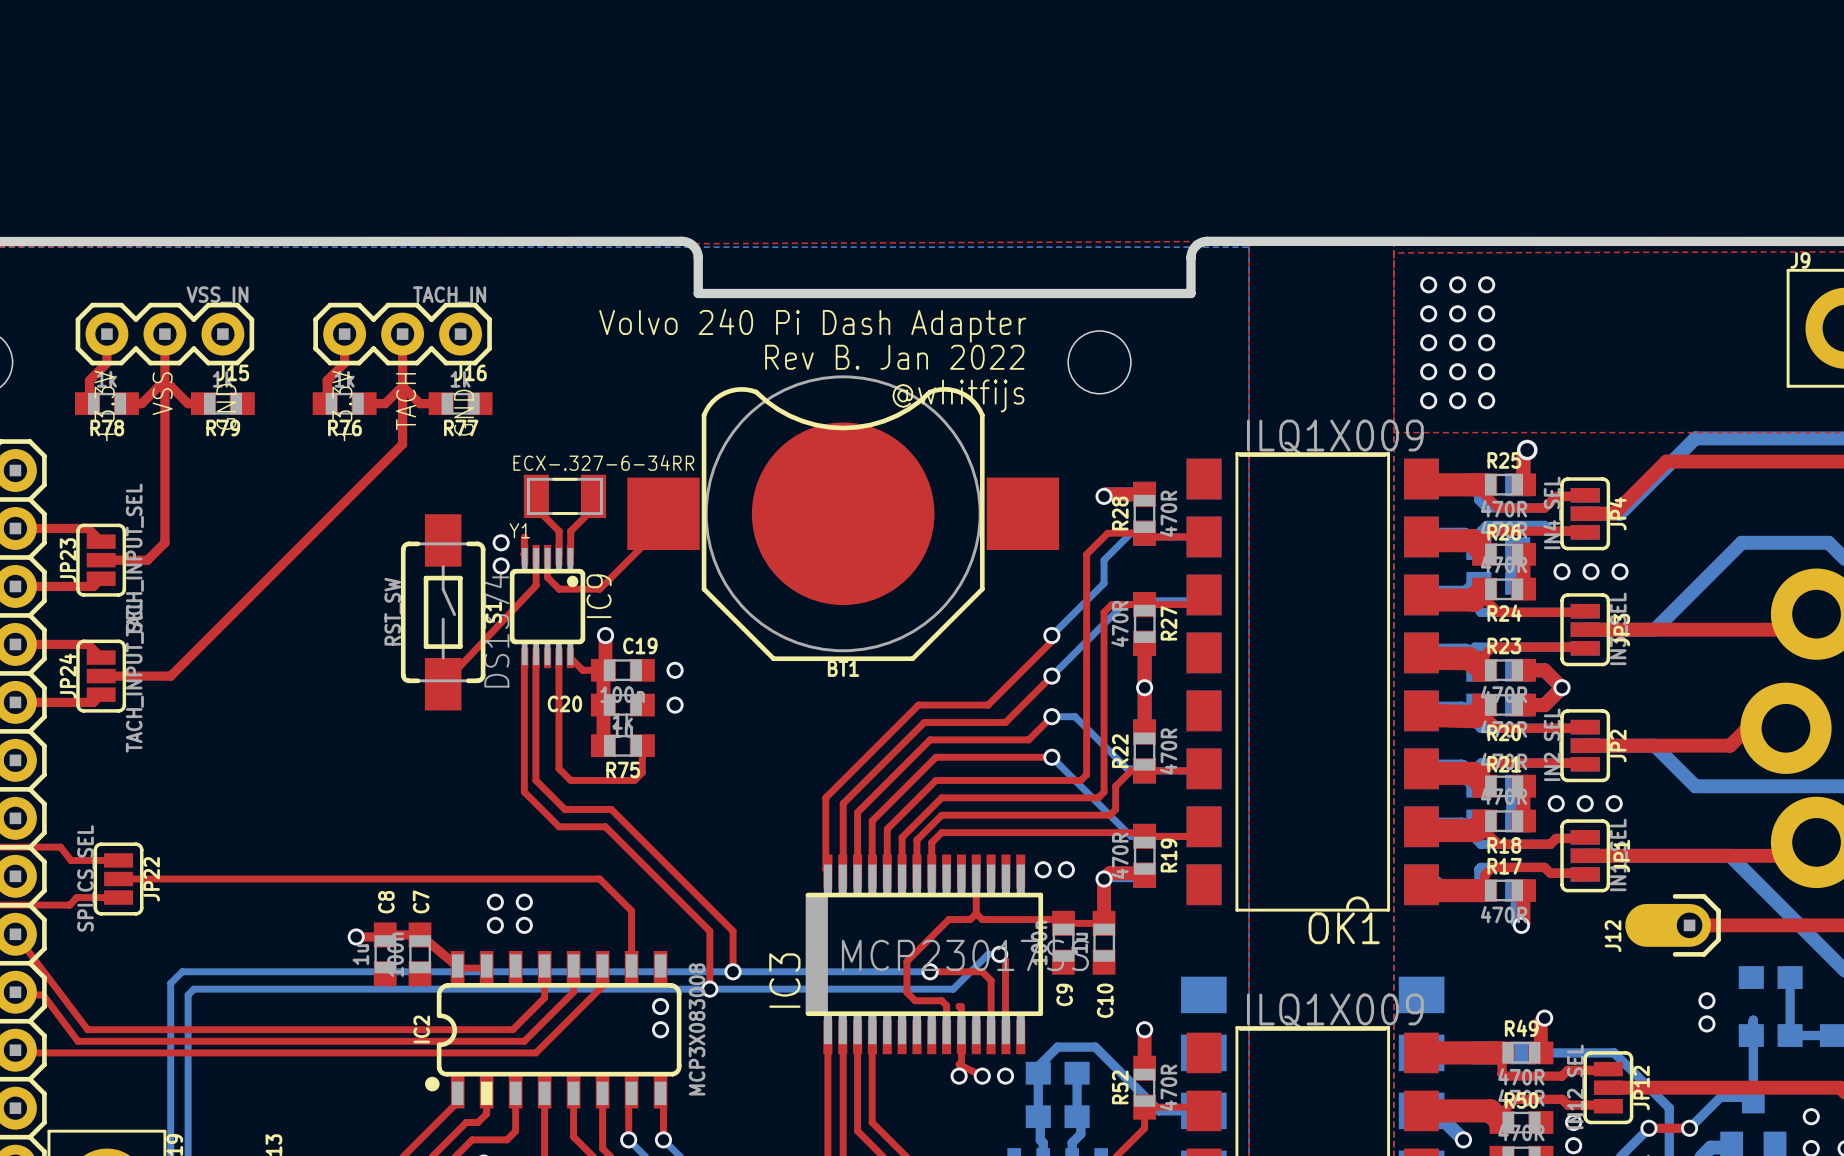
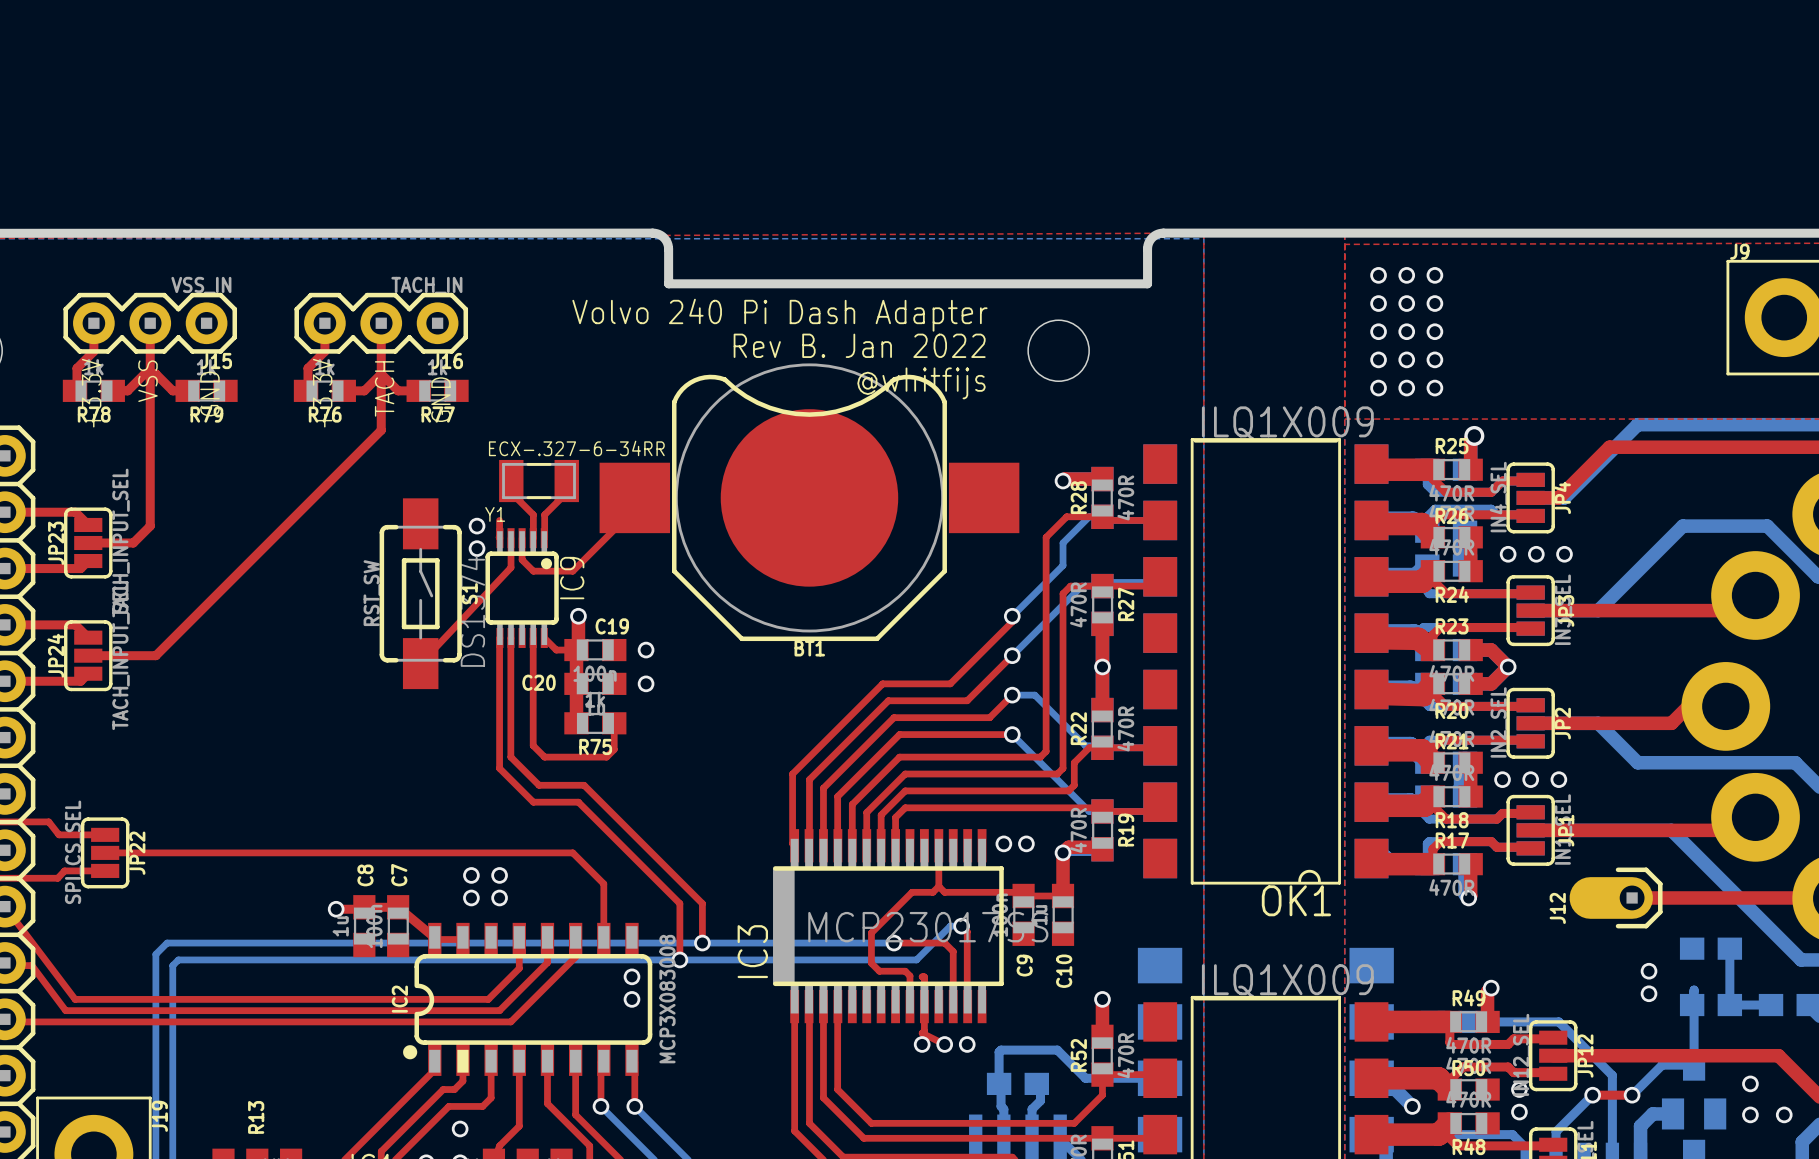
part: (1057, 1073) -> none
bottom track: (1077, 1073) (1077, 1116) -> none
bottom track: (1038, 1083) (1038, 1066) (1057, 1047) (1095, 1047) (1159, 1110) -> (999, 1052) (1001, 1050) (1057, 1050) (1085, 1078) (1116, 1078)

